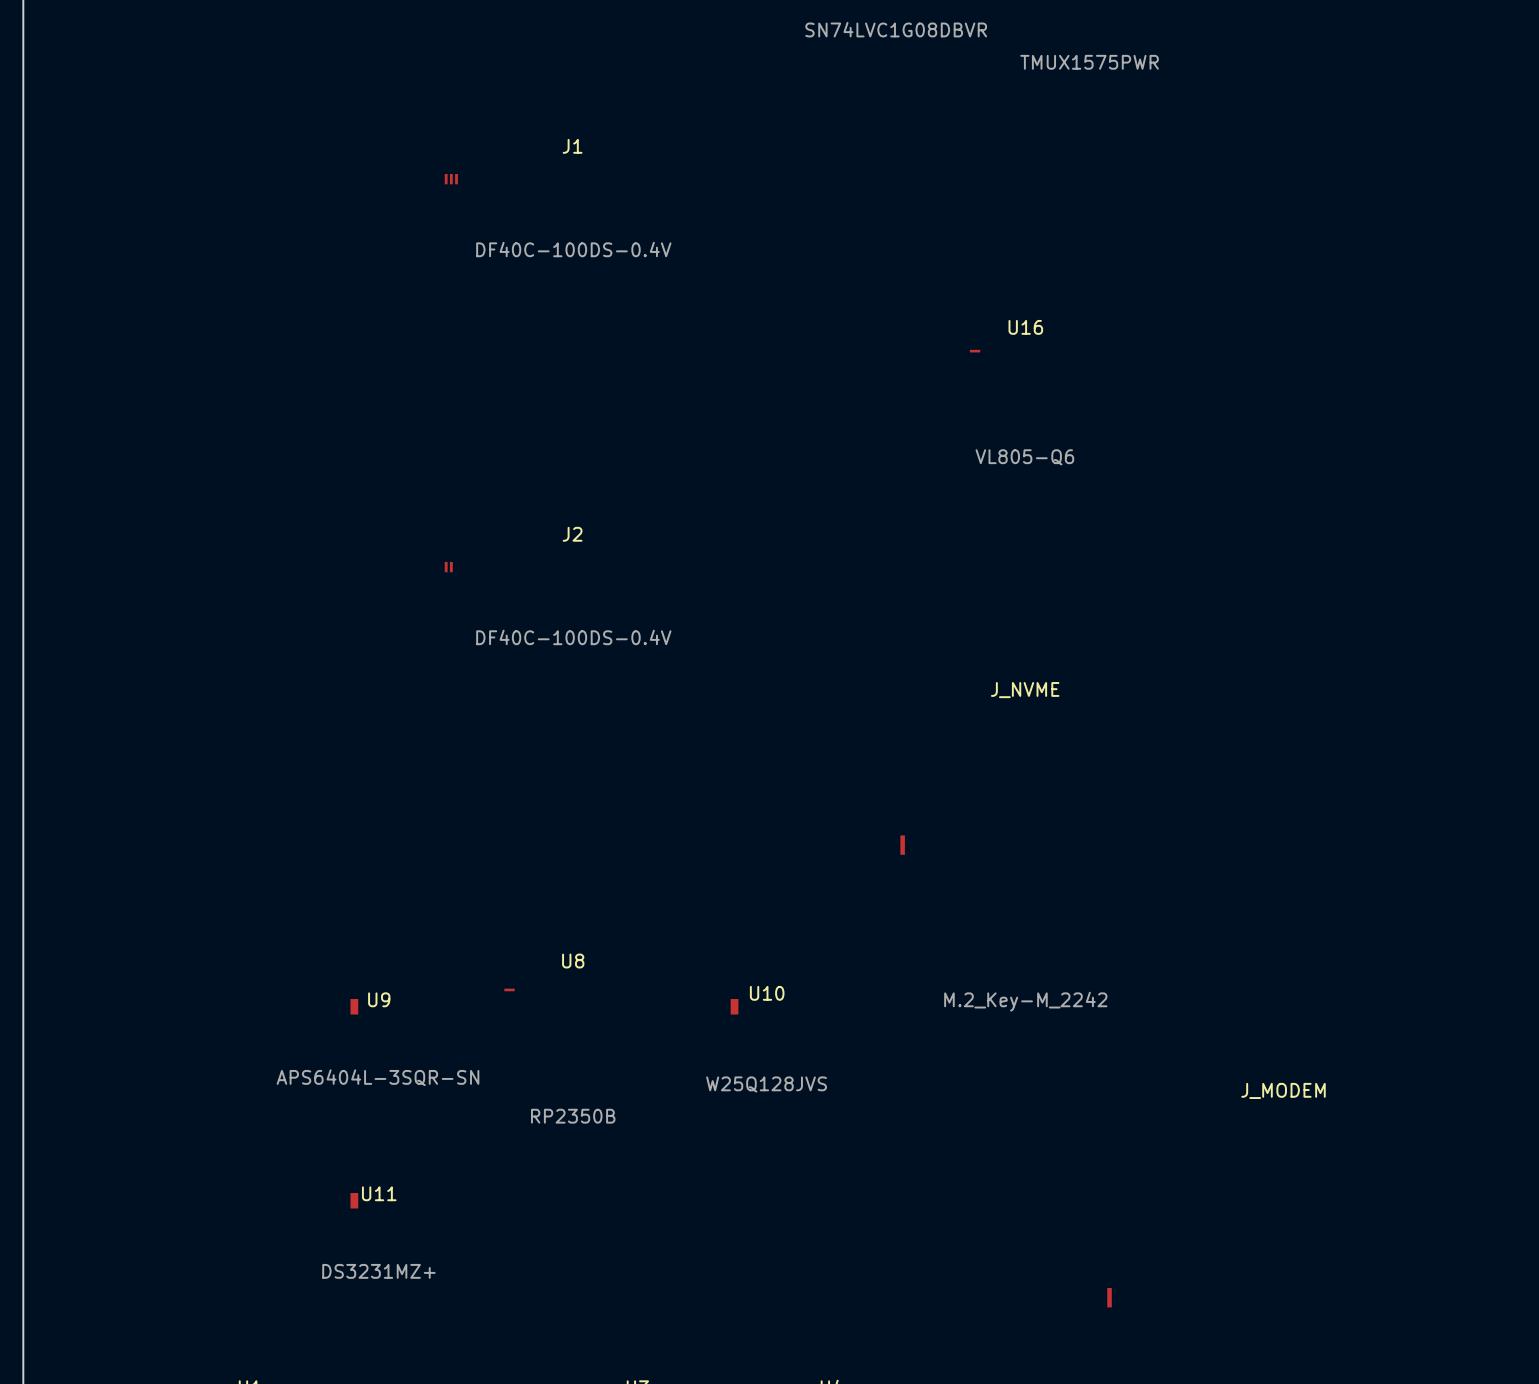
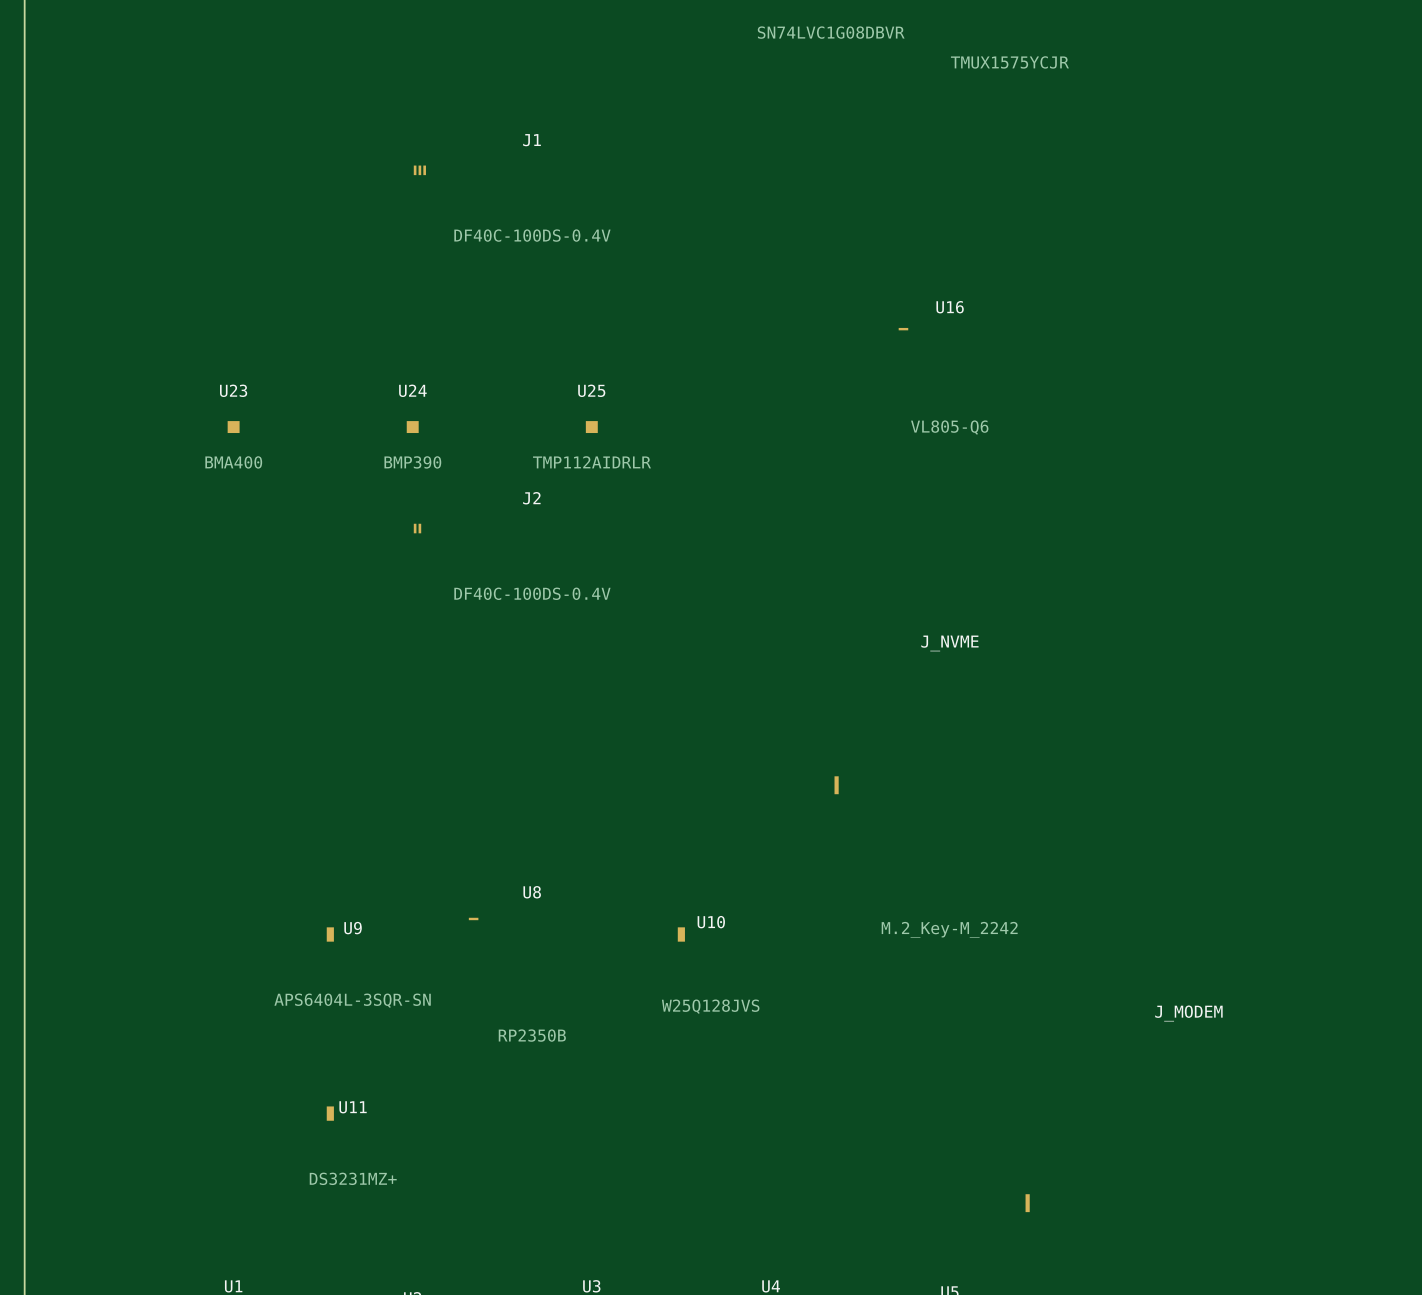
part value: TMUX1575PWR (1089, 62) -> TMUX1575YCJR (1009, 62)
U23: none -> BMA400 (233, 427)
U24: none -> BMP390 (412, 427)
U25: none -> TMP112AIDRLR (591, 427)

